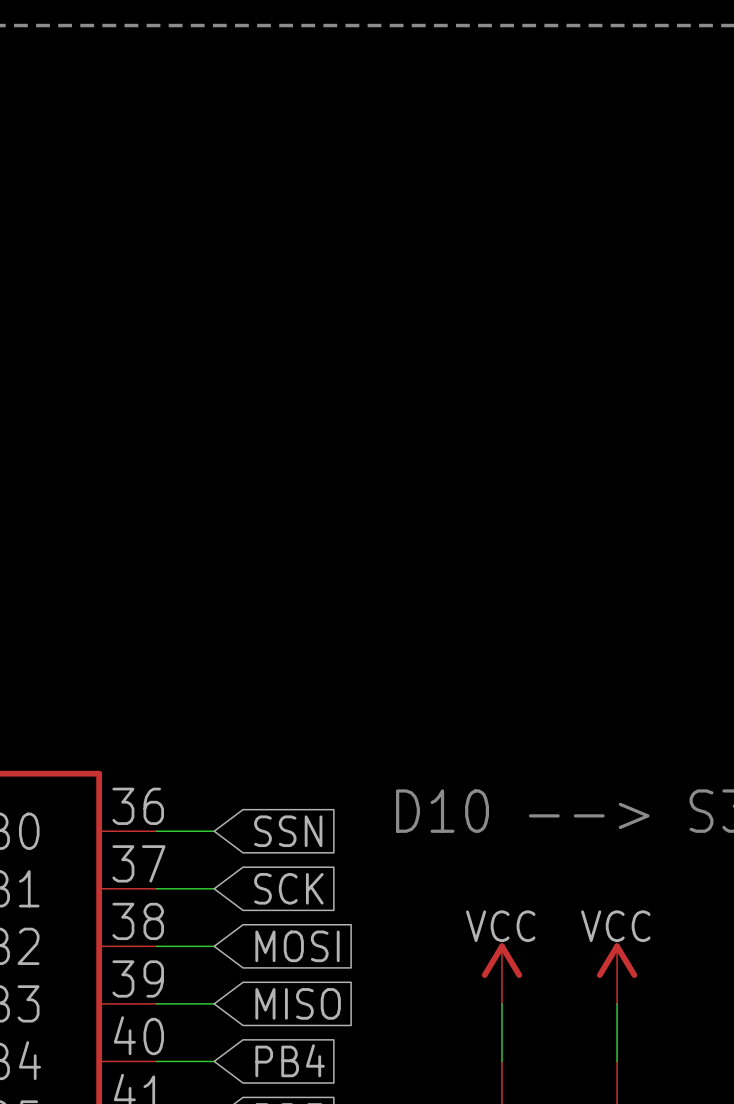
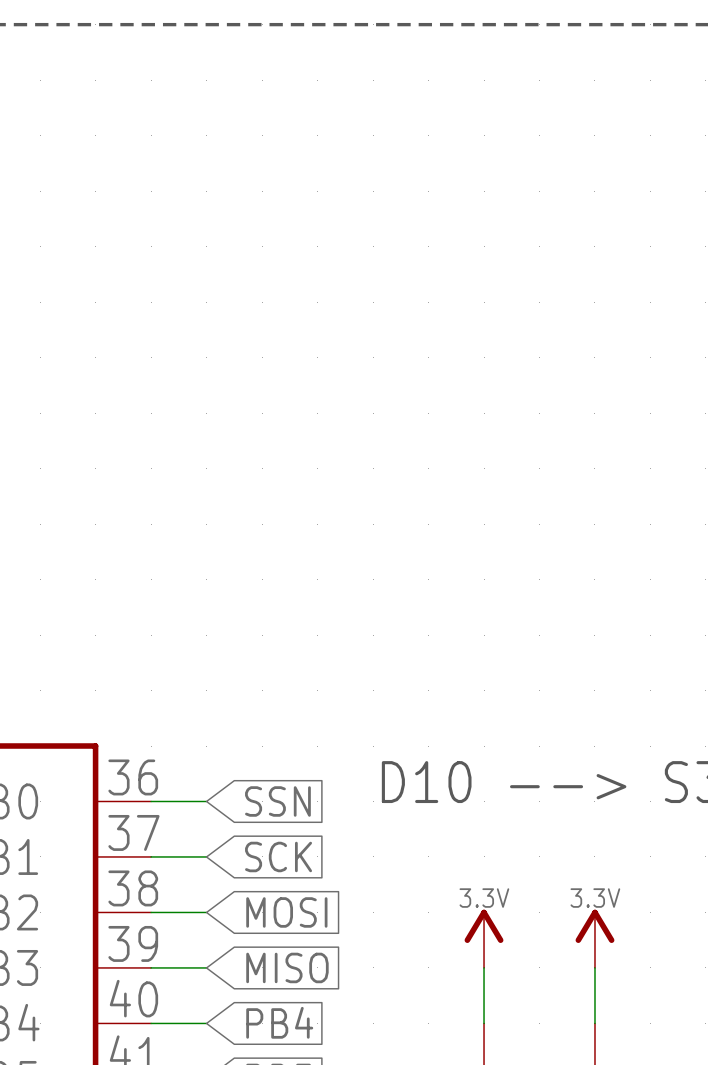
power symbol text: VCC (500, 926) -> none
power symbol text: VCC (615, 926) -> none
power symbol text: none -> 3.3V (484, 898)
power symbol text: none -> 3.3V (595, 898)

